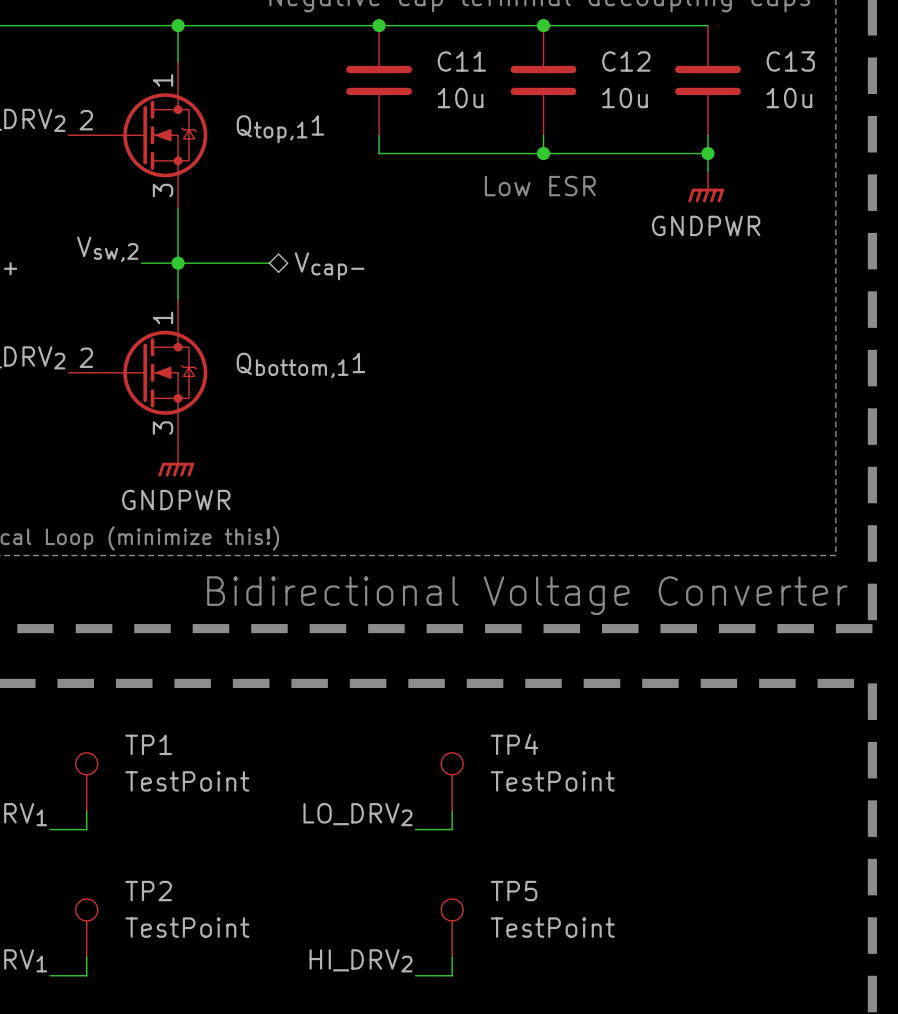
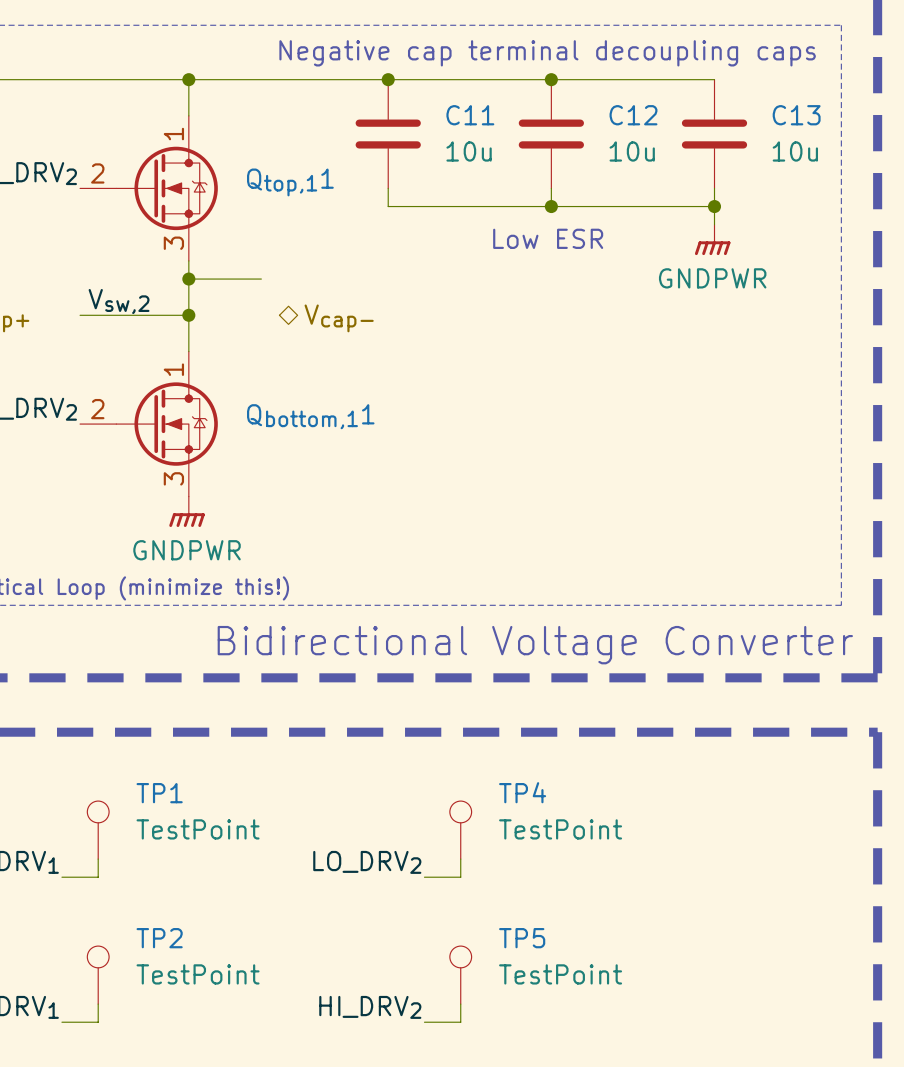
wire: none -> (188, 279) (261, 279)
junction: none -> (188, 279)
wire: none -> (80, 315) (152, 315)
wire: (178, 263) (269, 263) -> none

